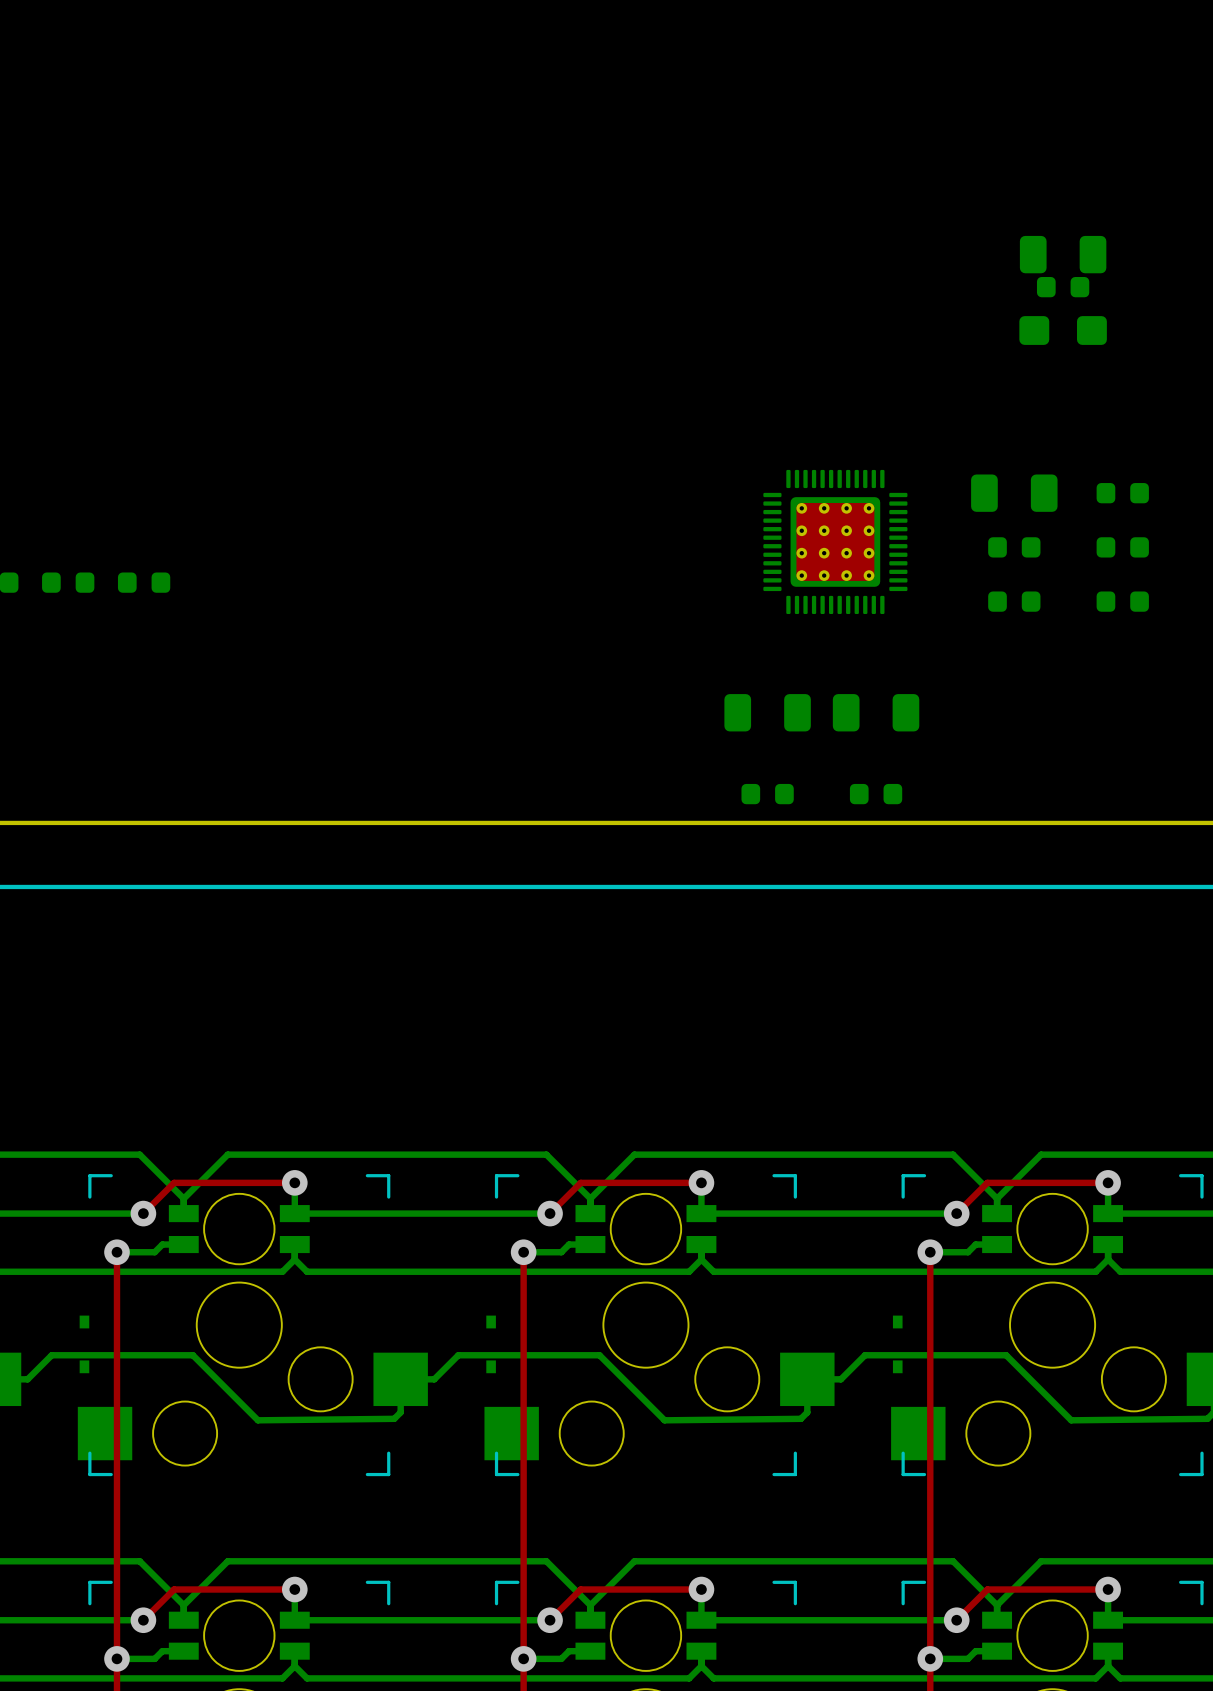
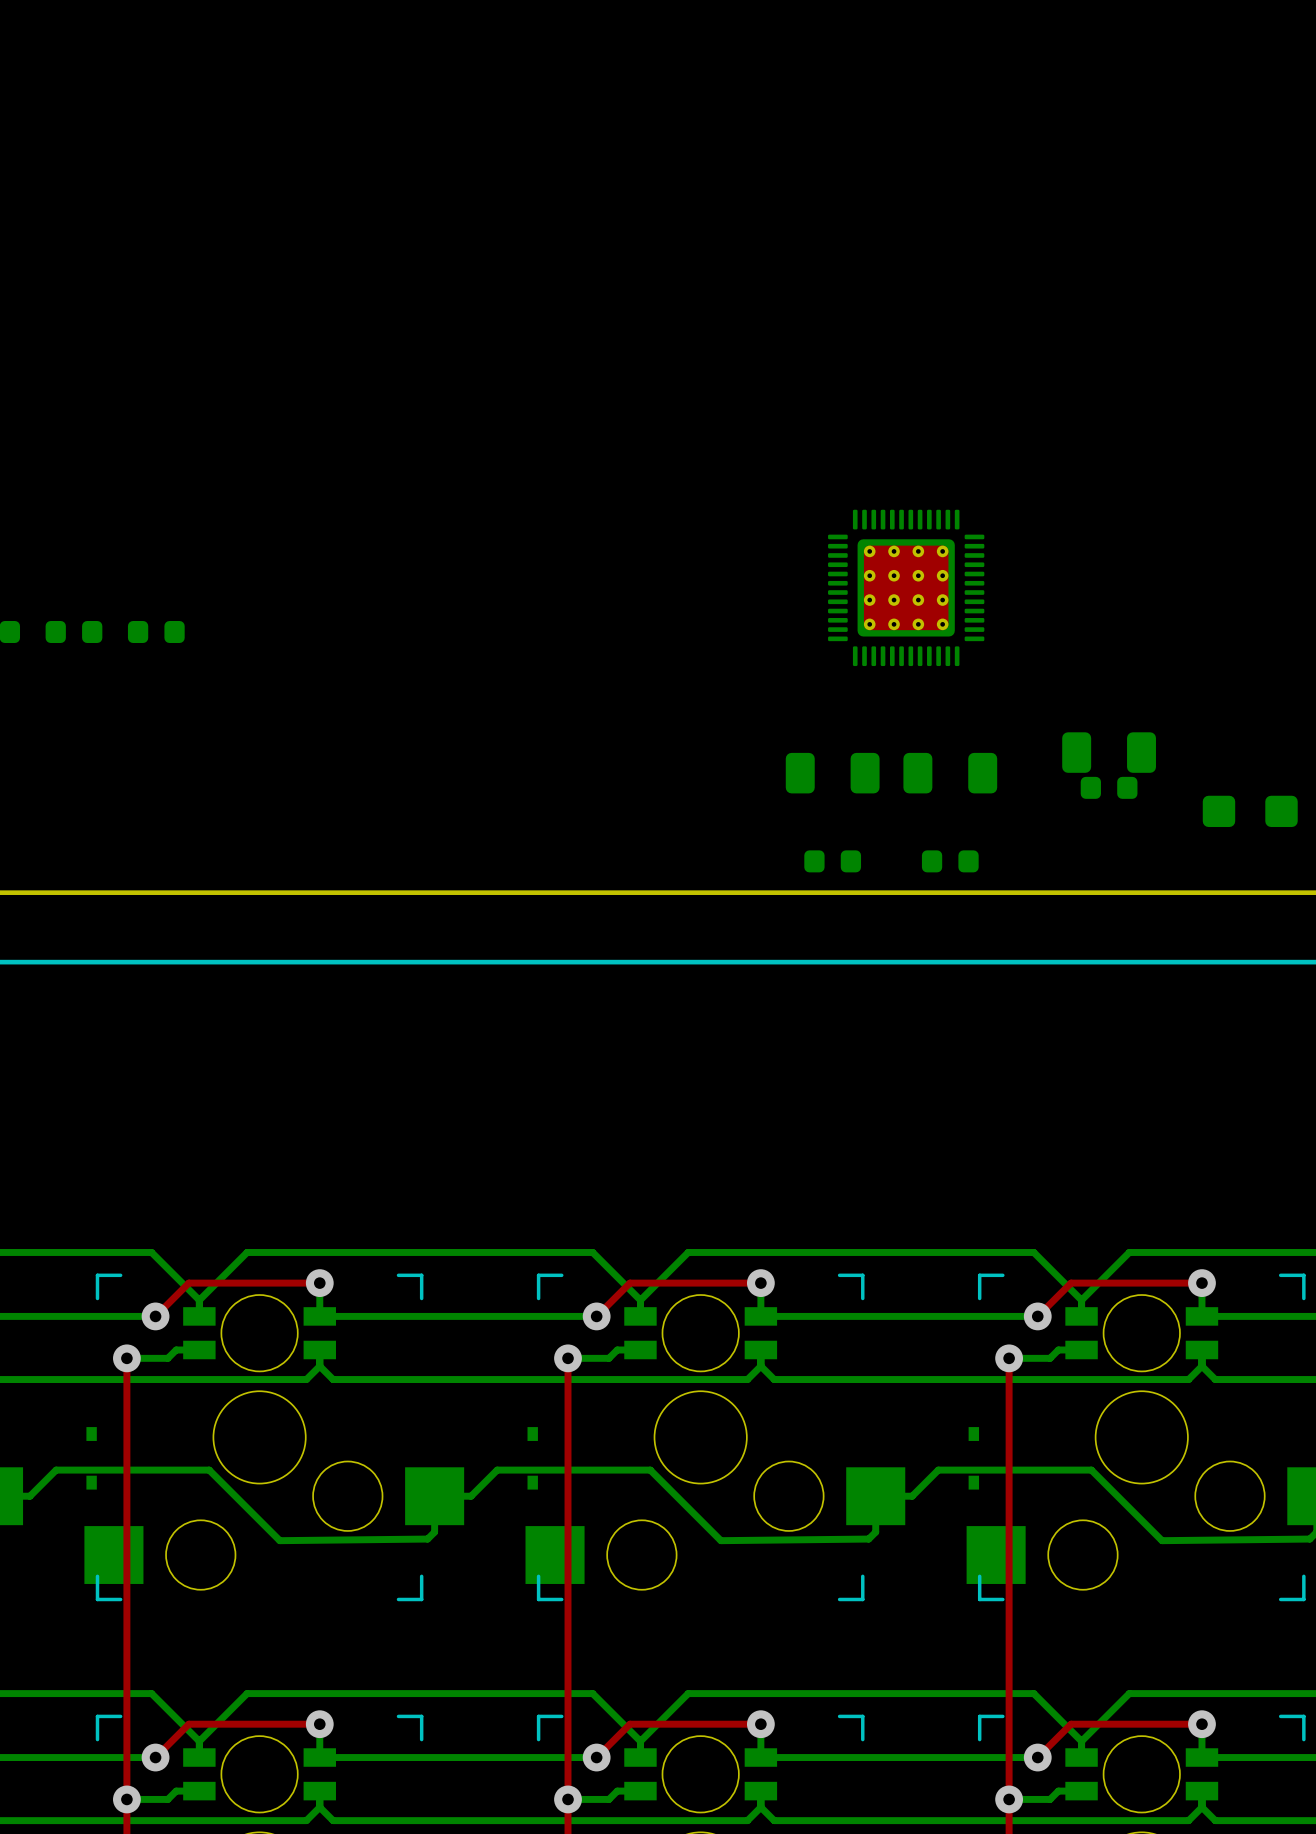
part: (1063, 254) -> none
part: (1063, 287) -> none
part position: (1063, 330) -> (1250, 811)
part position: (1014, 493) -> (1109, 752)
part: (1122, 493) -> none
part: (1014, 547) -> none
part: (1122, 547) -> none
part: (1014, 601) -> none
part: (1122, 601) -> none
part: none -> (1109, 787)

